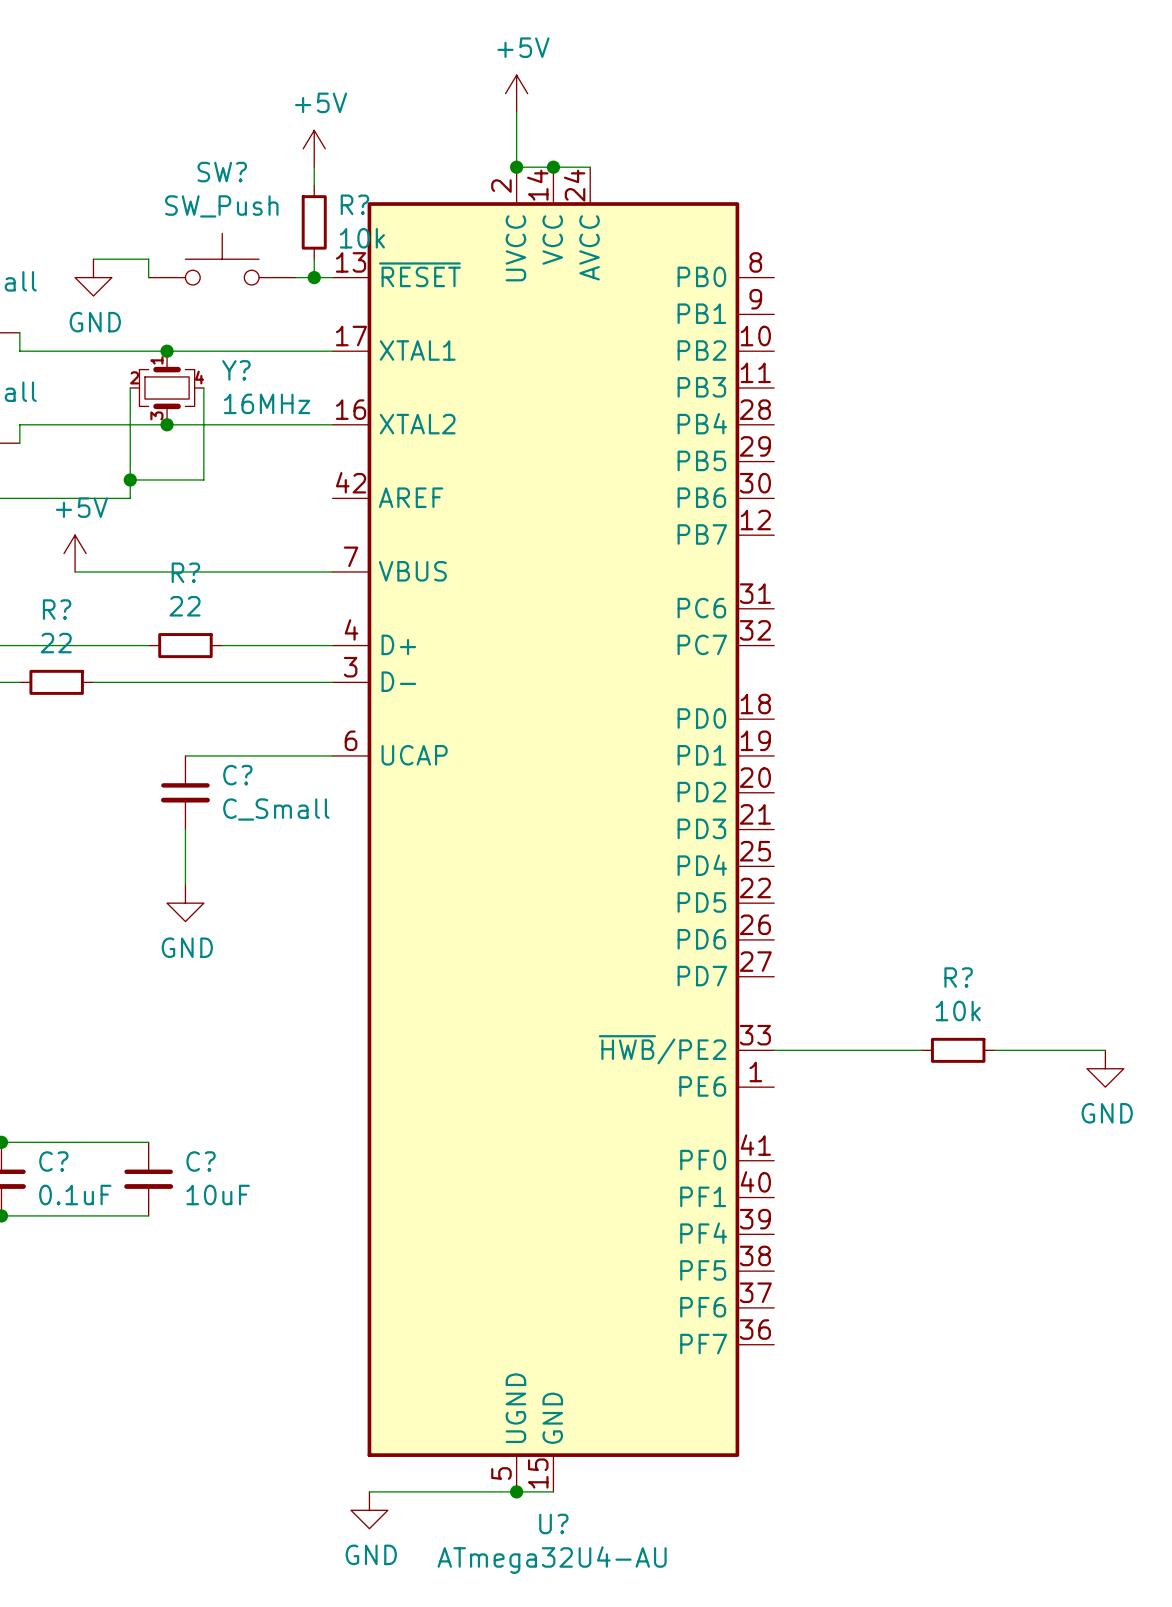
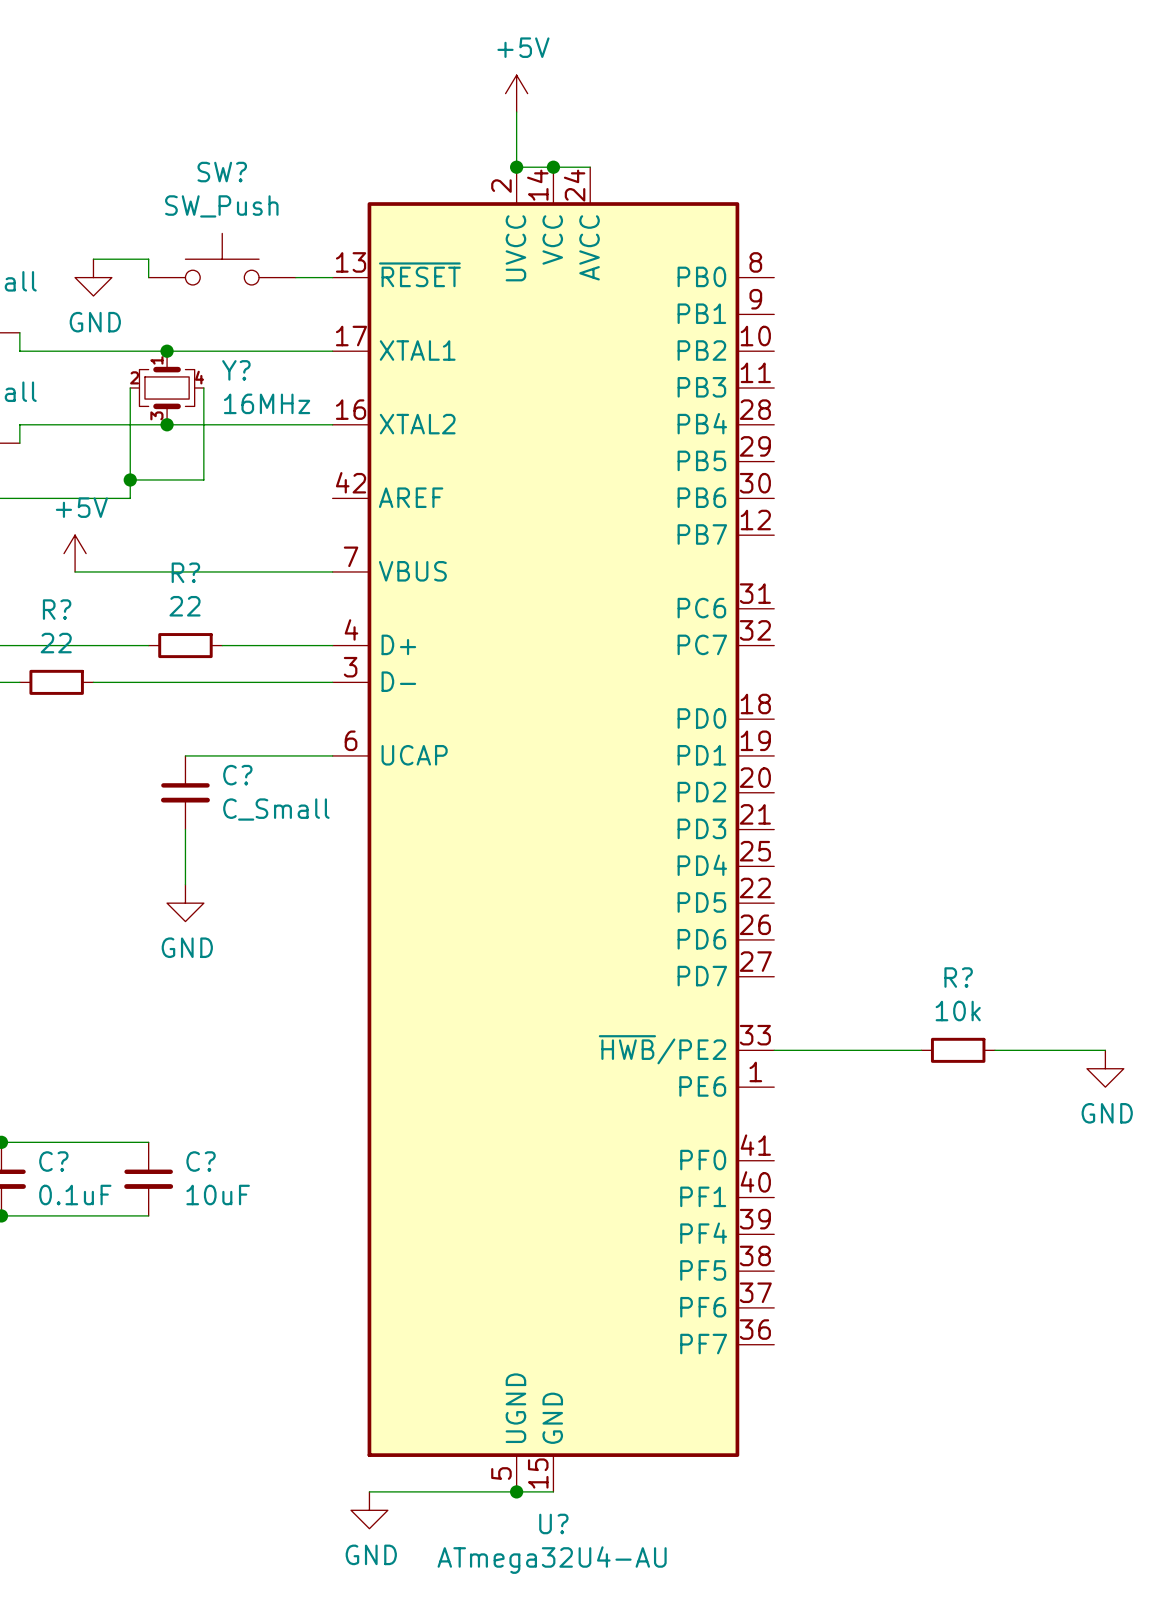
power symbol: +5V (314, 148) -> none
wire: (314, 167) (314, 185) -> none
R?: 10k (314, 222) -> none
wire: (314, 259) (314, 277) -> none
junction: (314, 277) -> none

